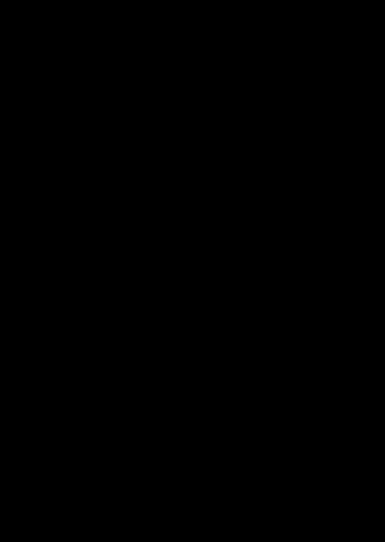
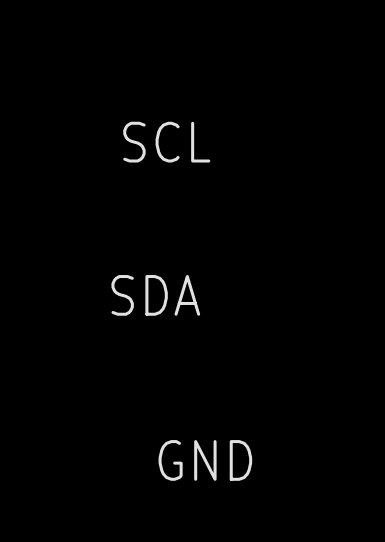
text: none -> SCL (166, 142)
text: none -> SDA (155, 295)
text: none -> GND (205, 460)

